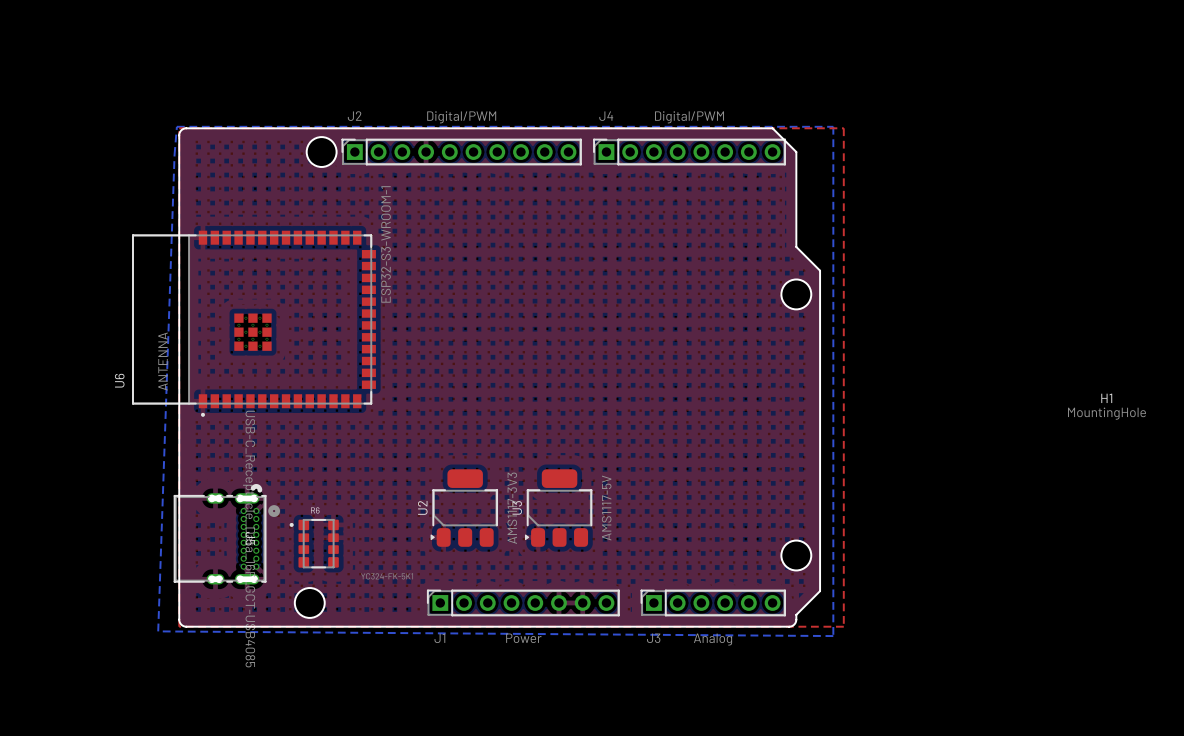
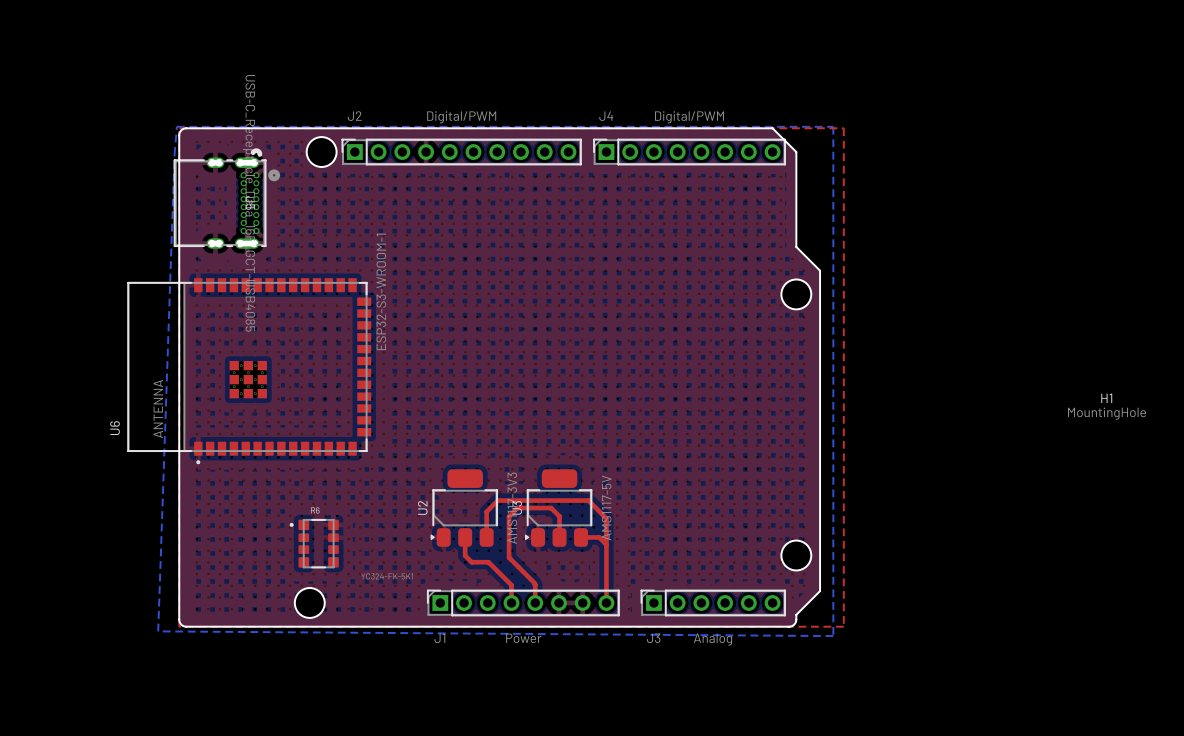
U6 position: (254, 323) -> (249, 371)
J5 position: (226, 534) -> (226, 198)
top track: none -> (465, 537) (465, 555) (471, 562) (488, 562) (511, 585) (511, 602)
top track: none -> (486, 537) (486, 511) (497, 500) (588, 500) (606, 518) (606, 602)
top track: none -> (559, 537) (559, 516) (551, 508) (517, 508) (509, 516) (509, 557) (534, 582) (535, 602)
top track: none -> (581, 537) (599, 537) (606, 544)

